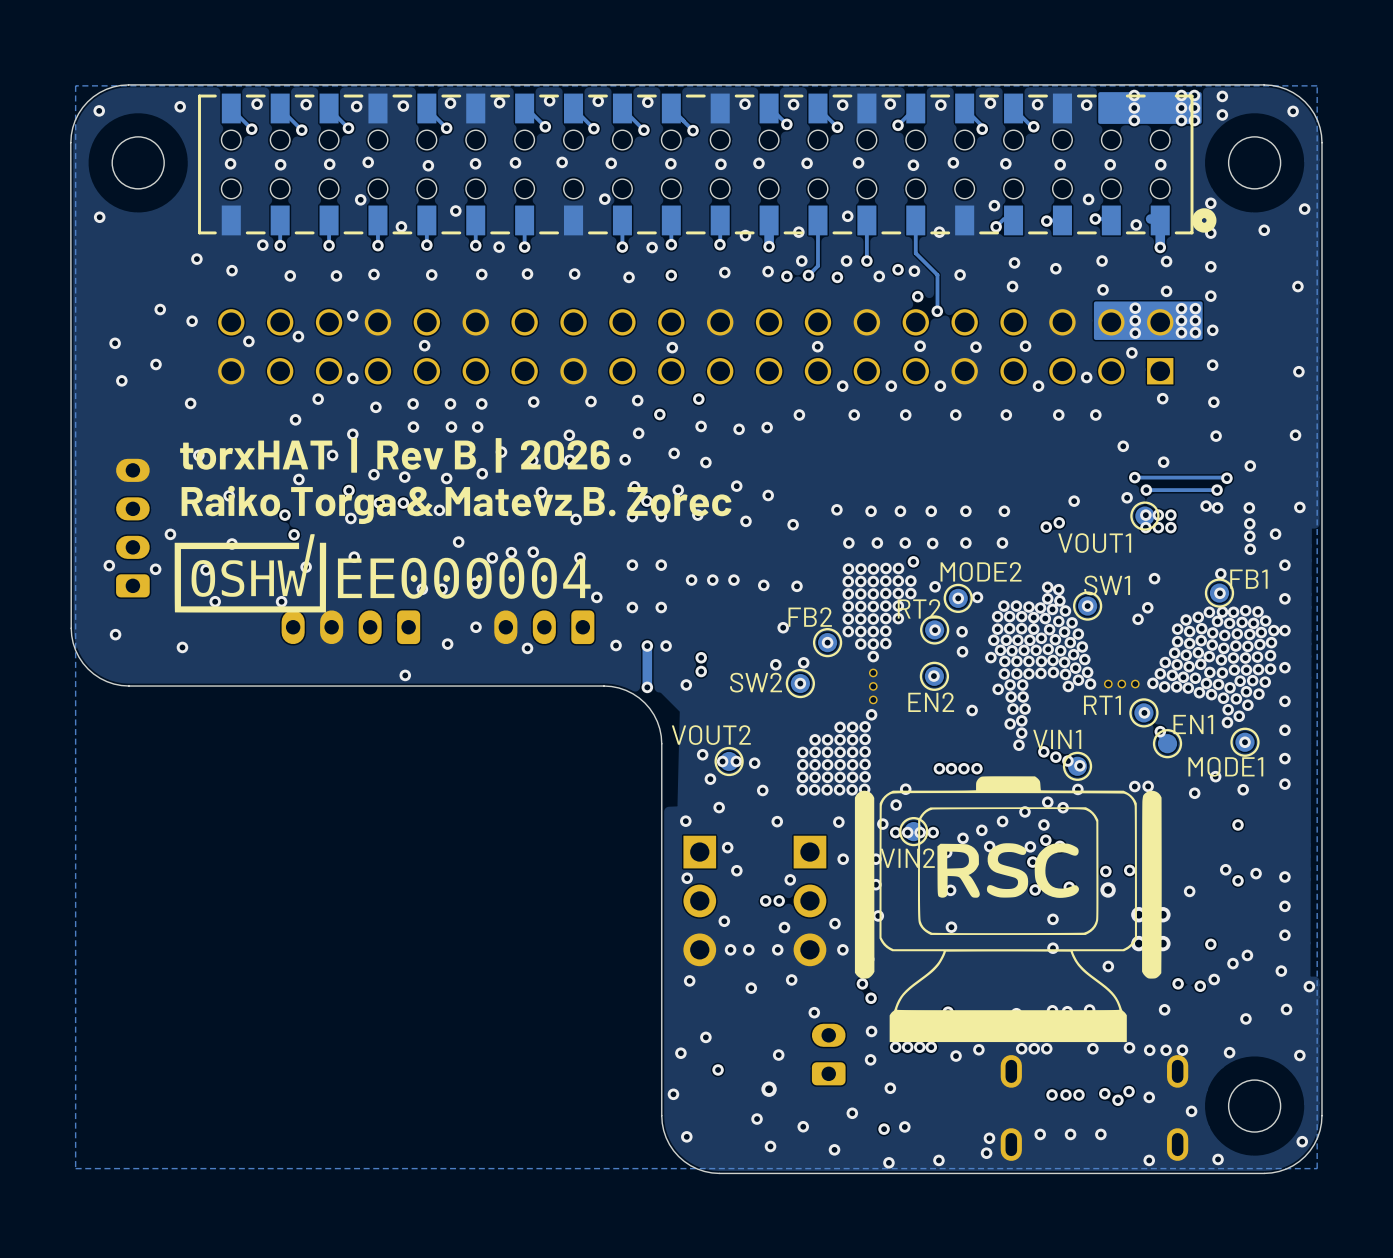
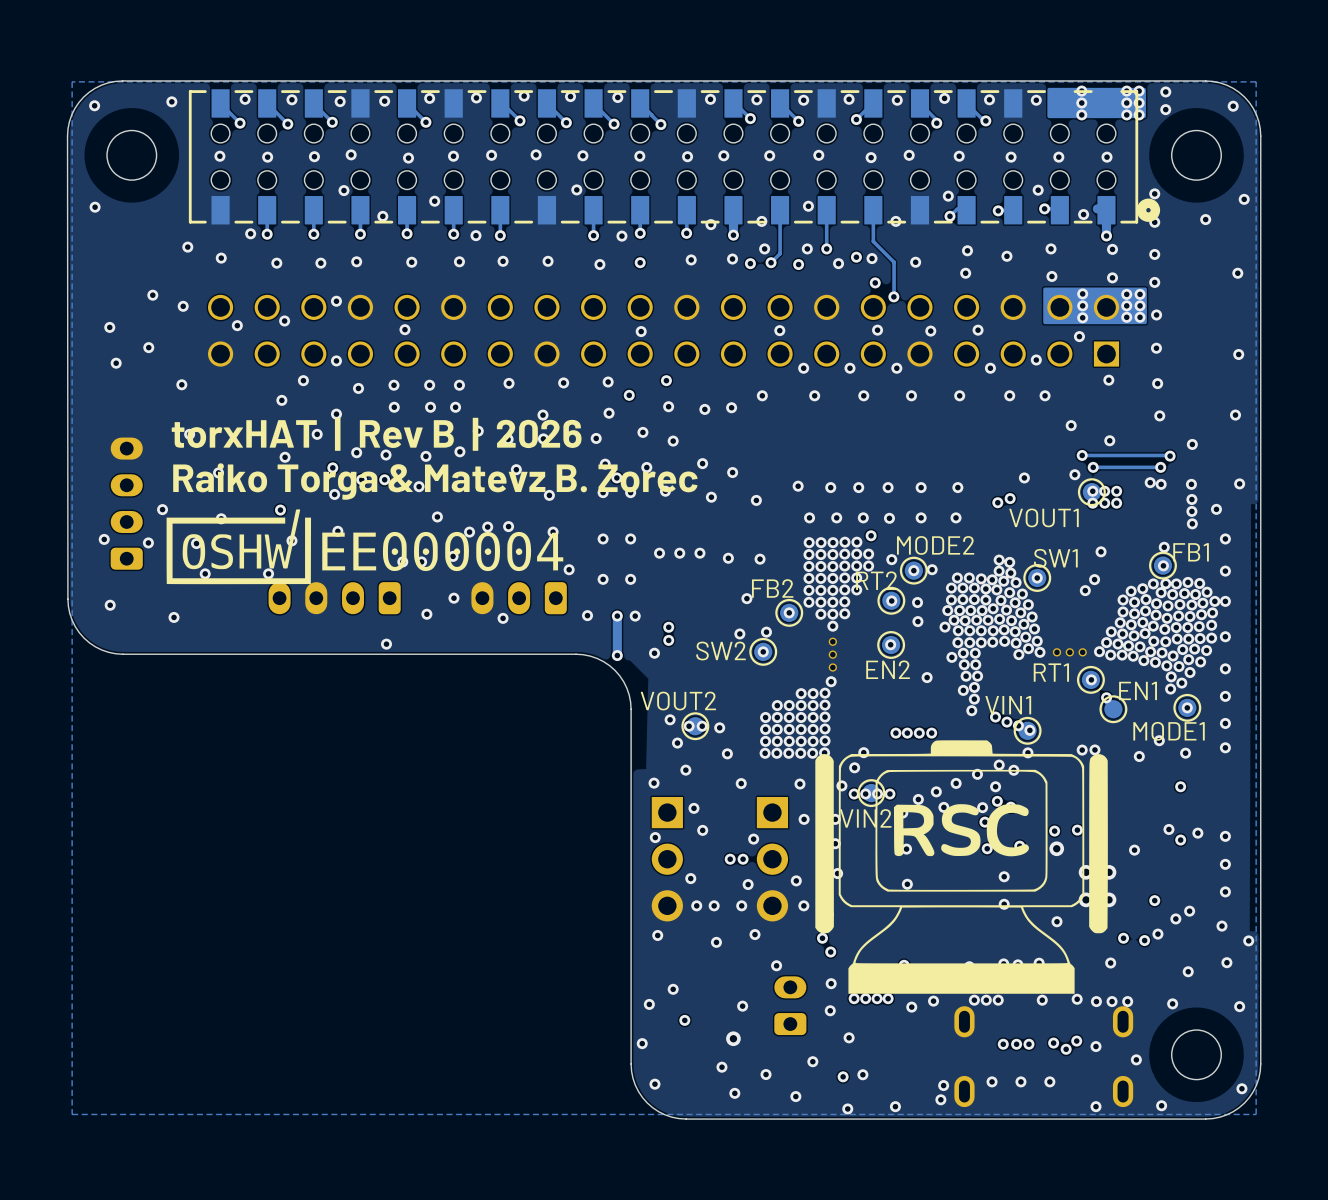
via: (284, 515) -> none

